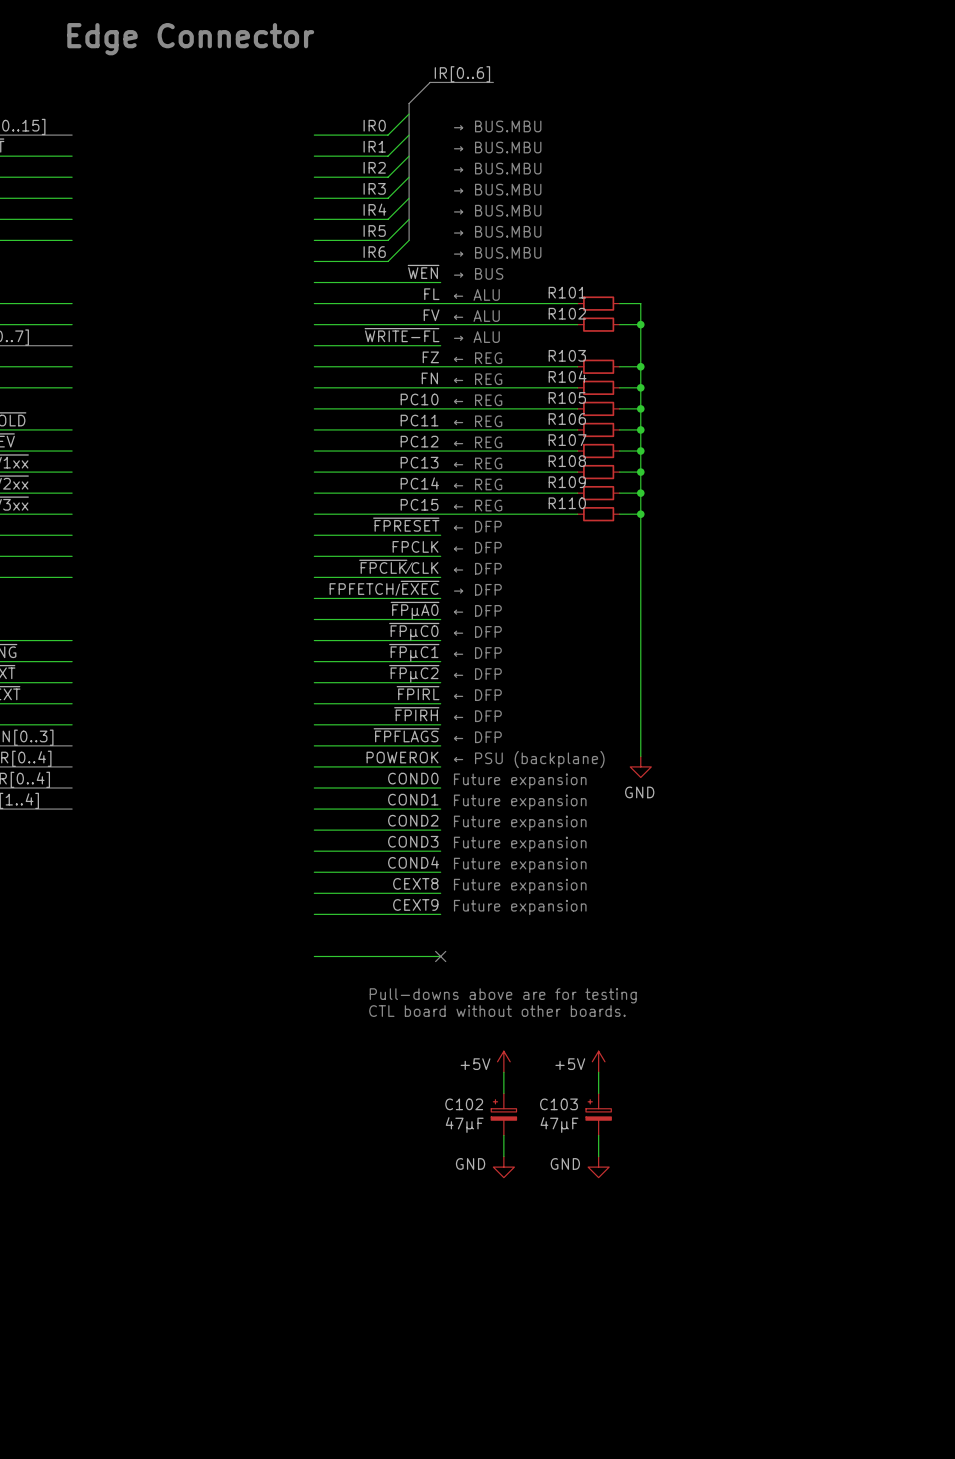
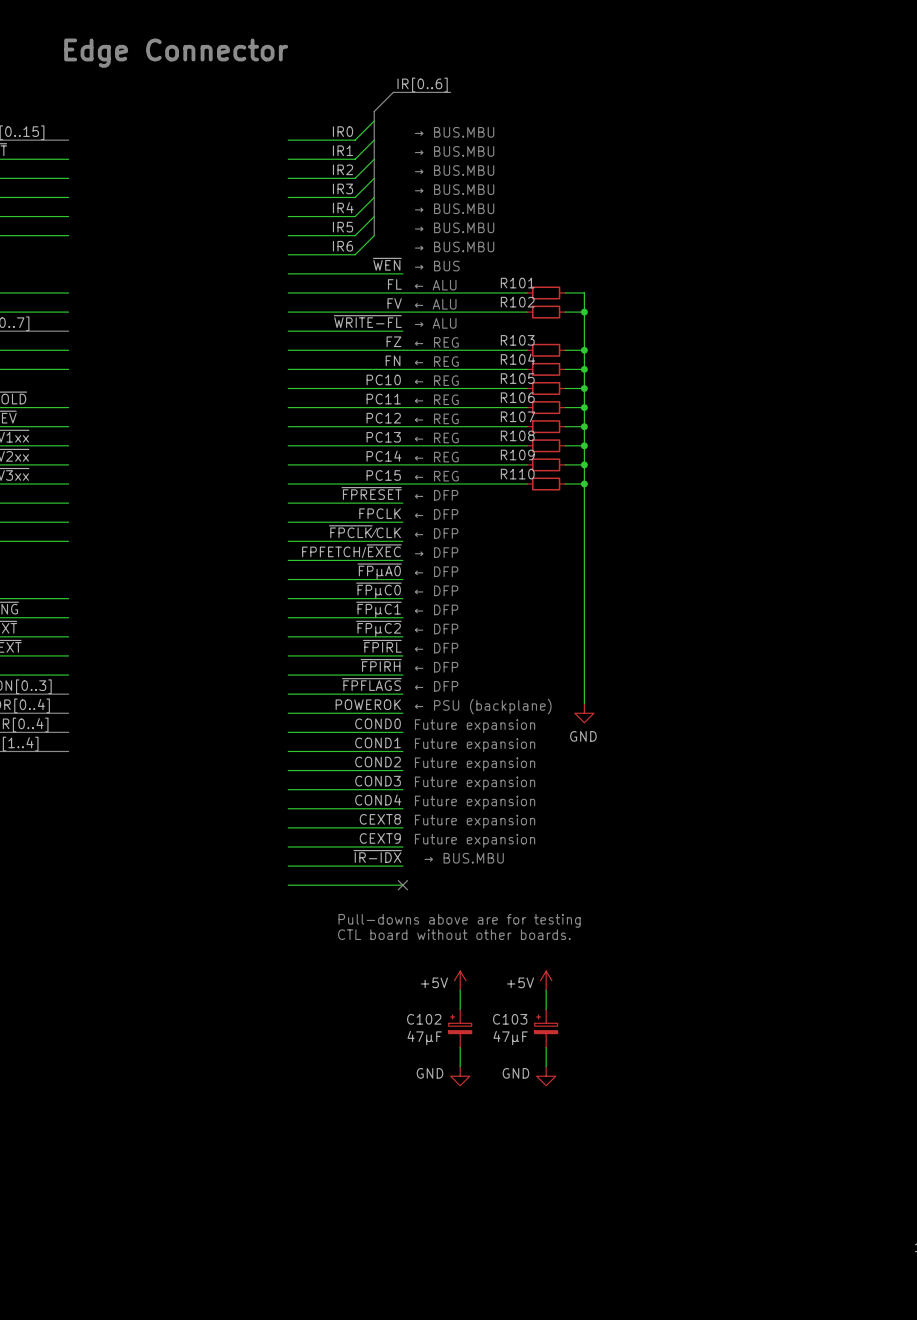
label: none -> ~{IR-IDX} (377, 856)
text: none -> → BUS.MBU (464, 858)
wire: none -> (288, 866) (402, 866)

